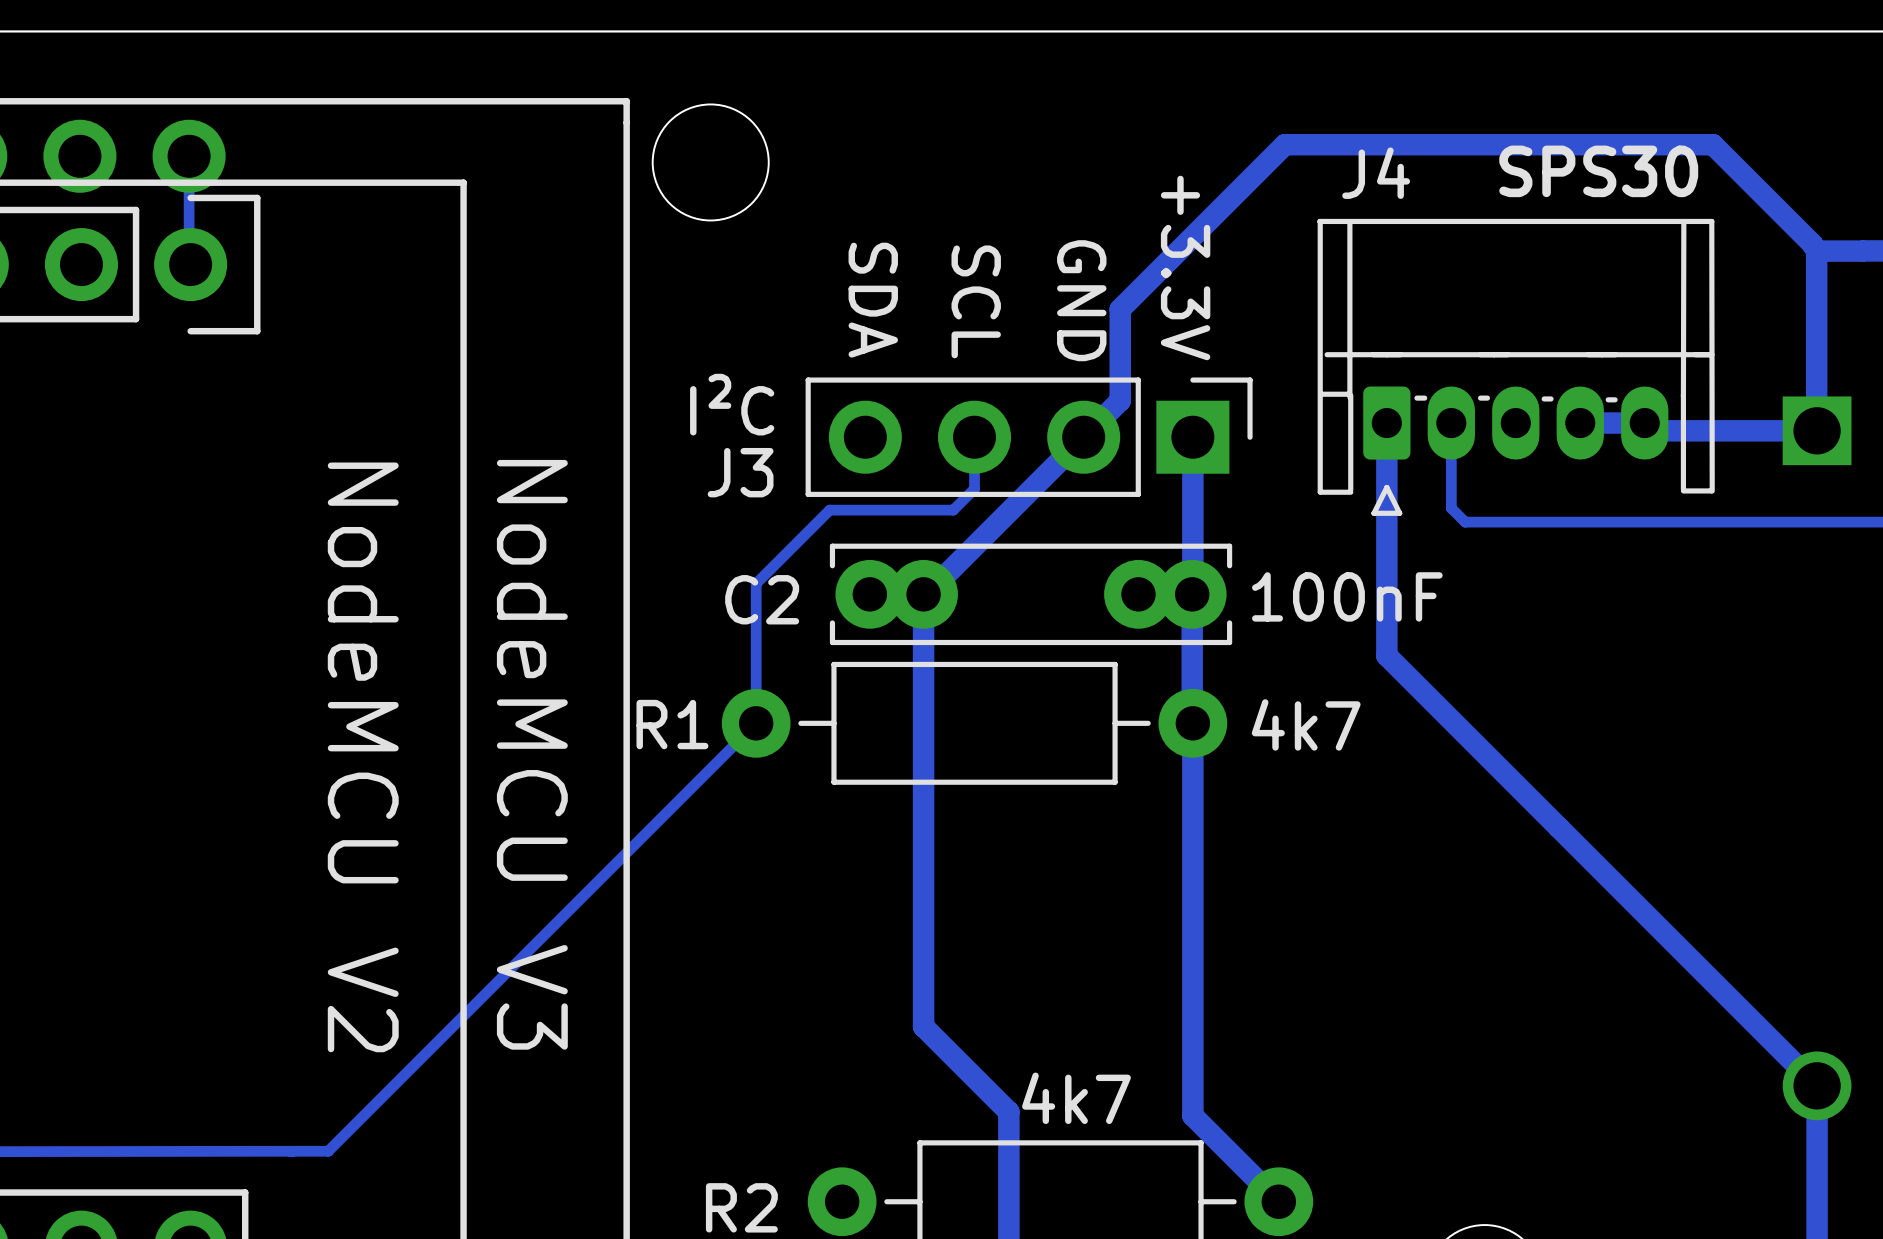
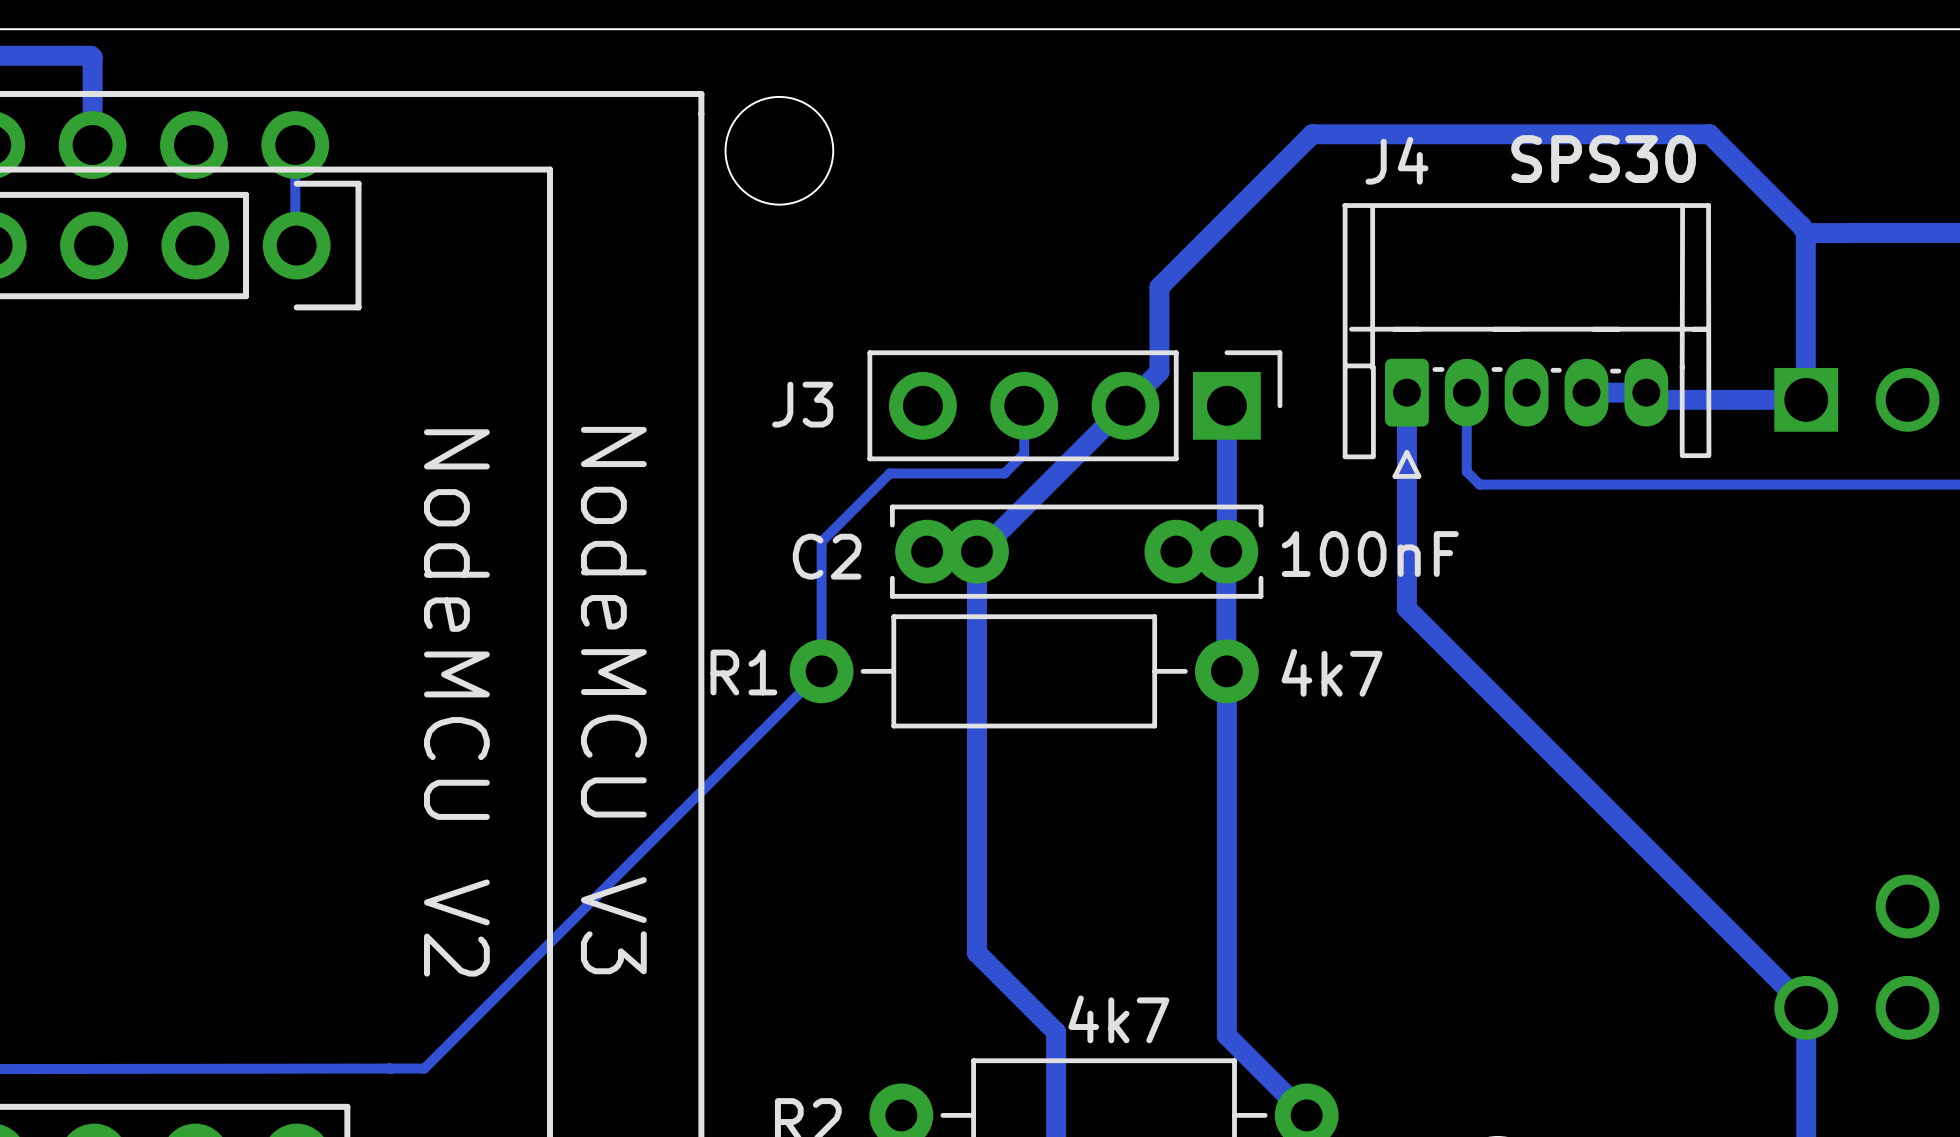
text: +3.3V (1185, 267) -> none
text: SDA (873, 300) -> none
text: GND (1081, 300) -> none
text: SCL (976, 301) -> none
text: I²C (732, 404) -> none
J3 name position: J3 (740, 472) -> J3 (802, 404)

